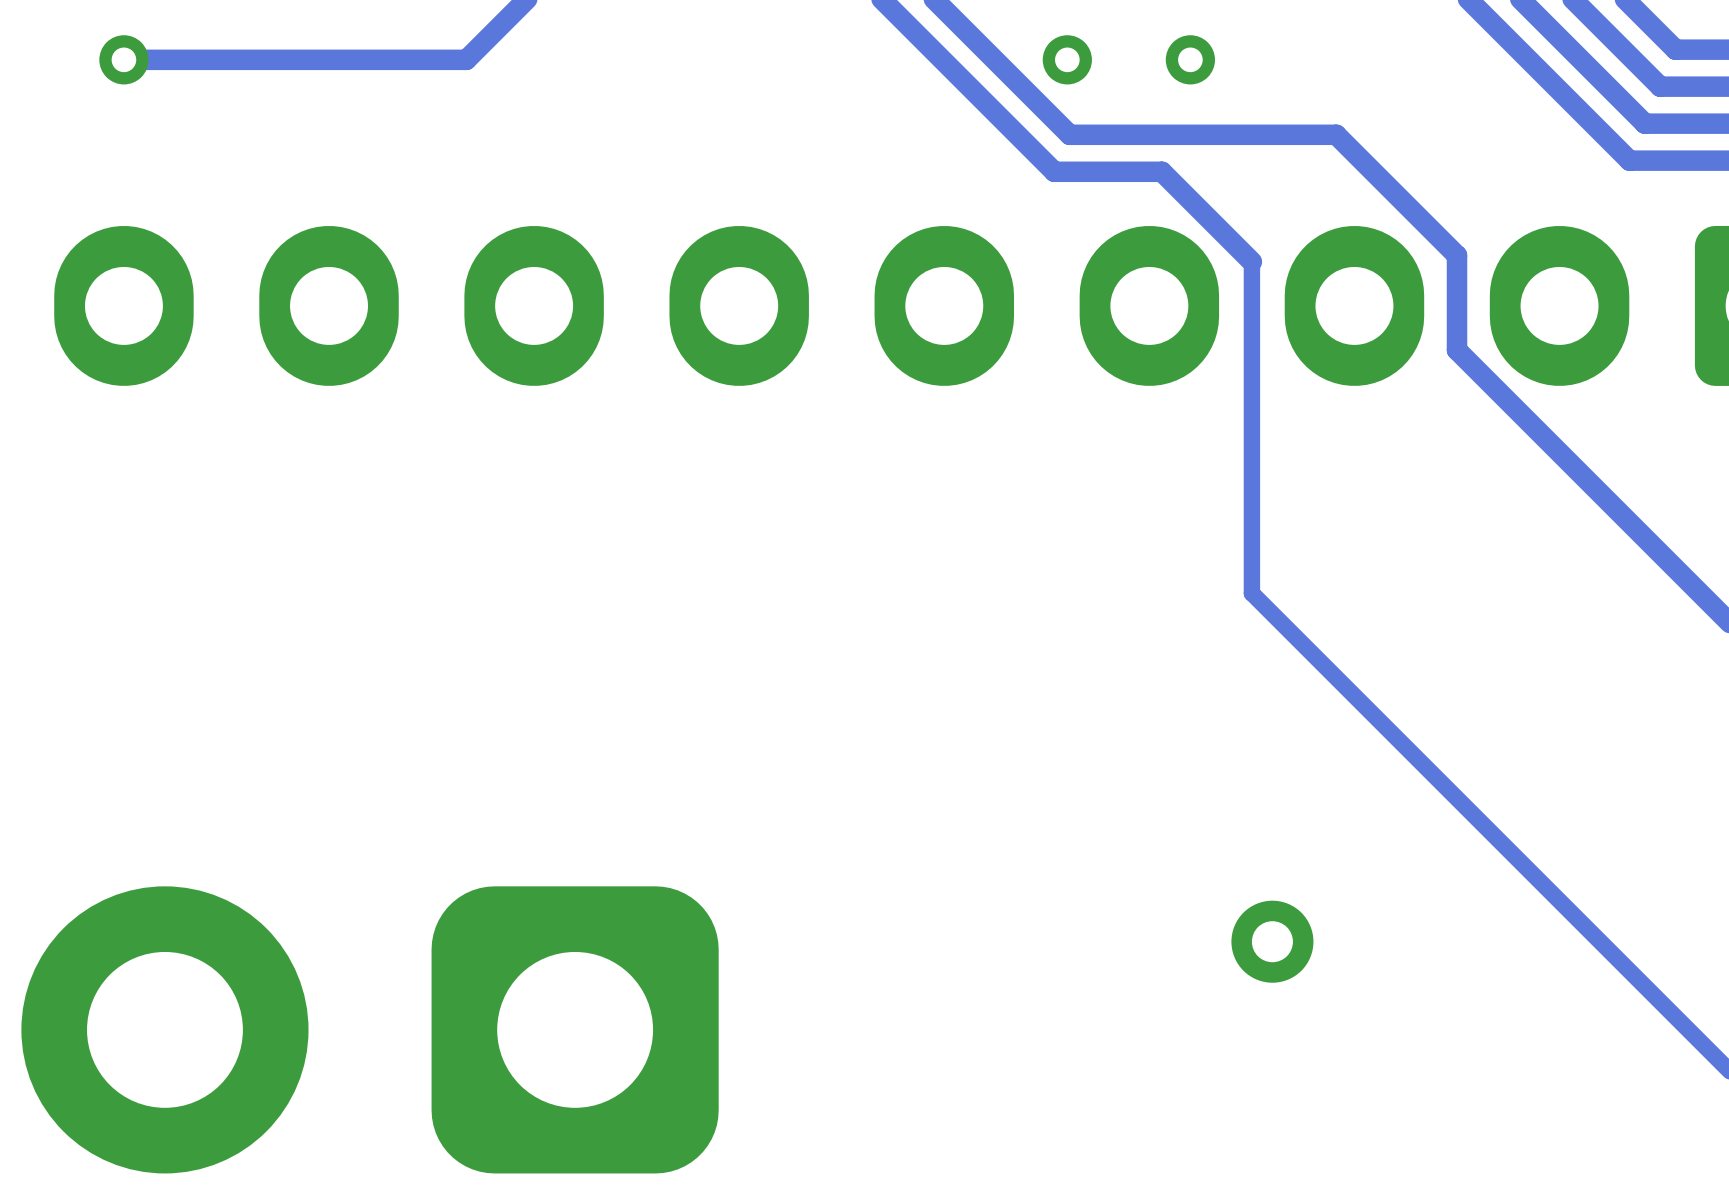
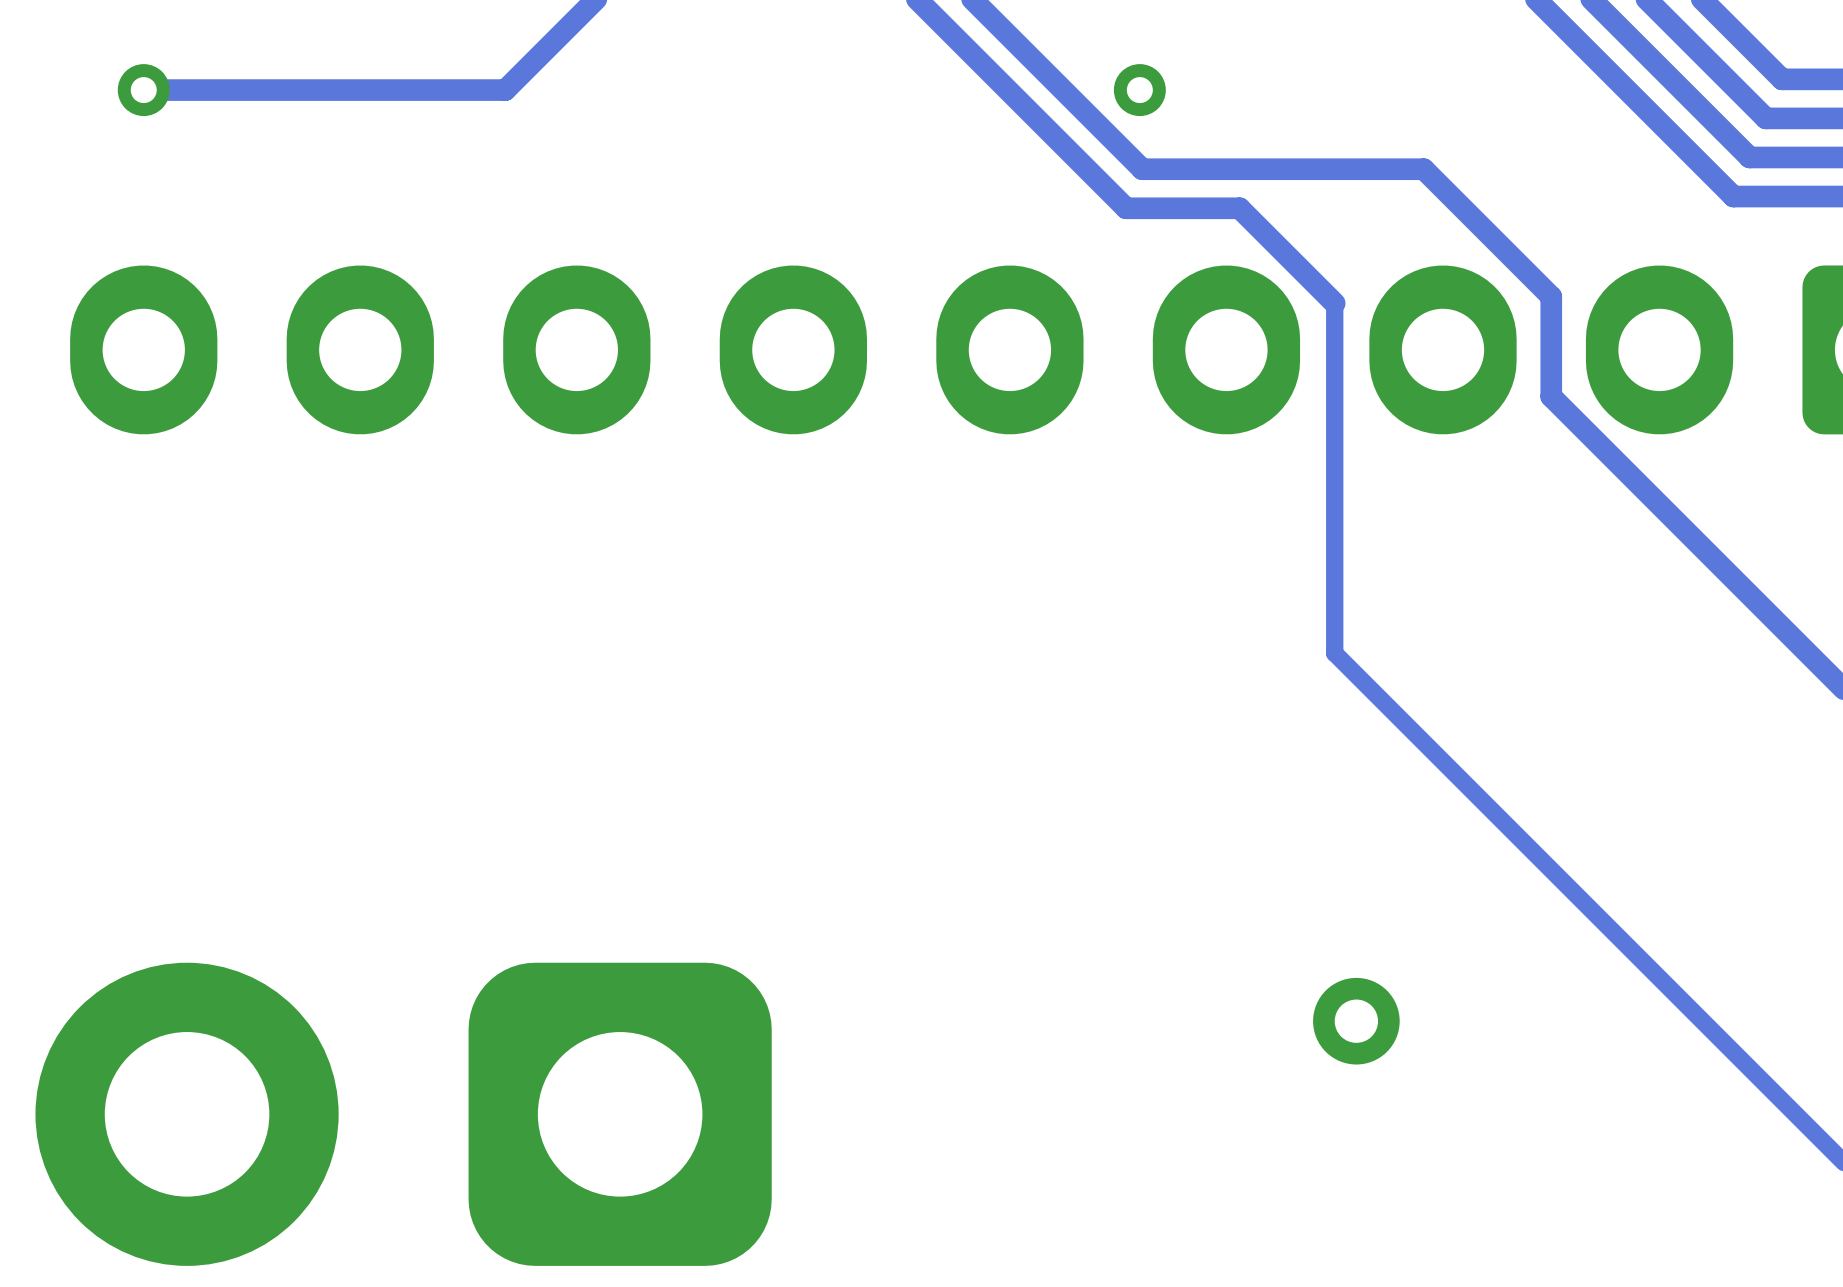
via: (1190, 59) -> none

